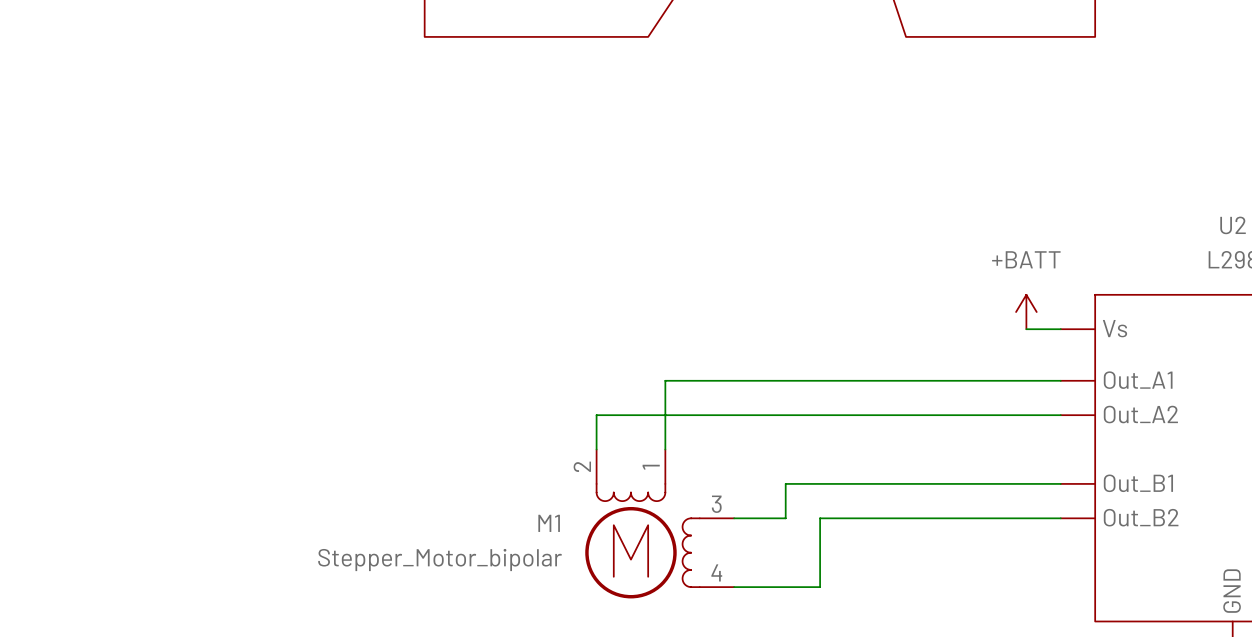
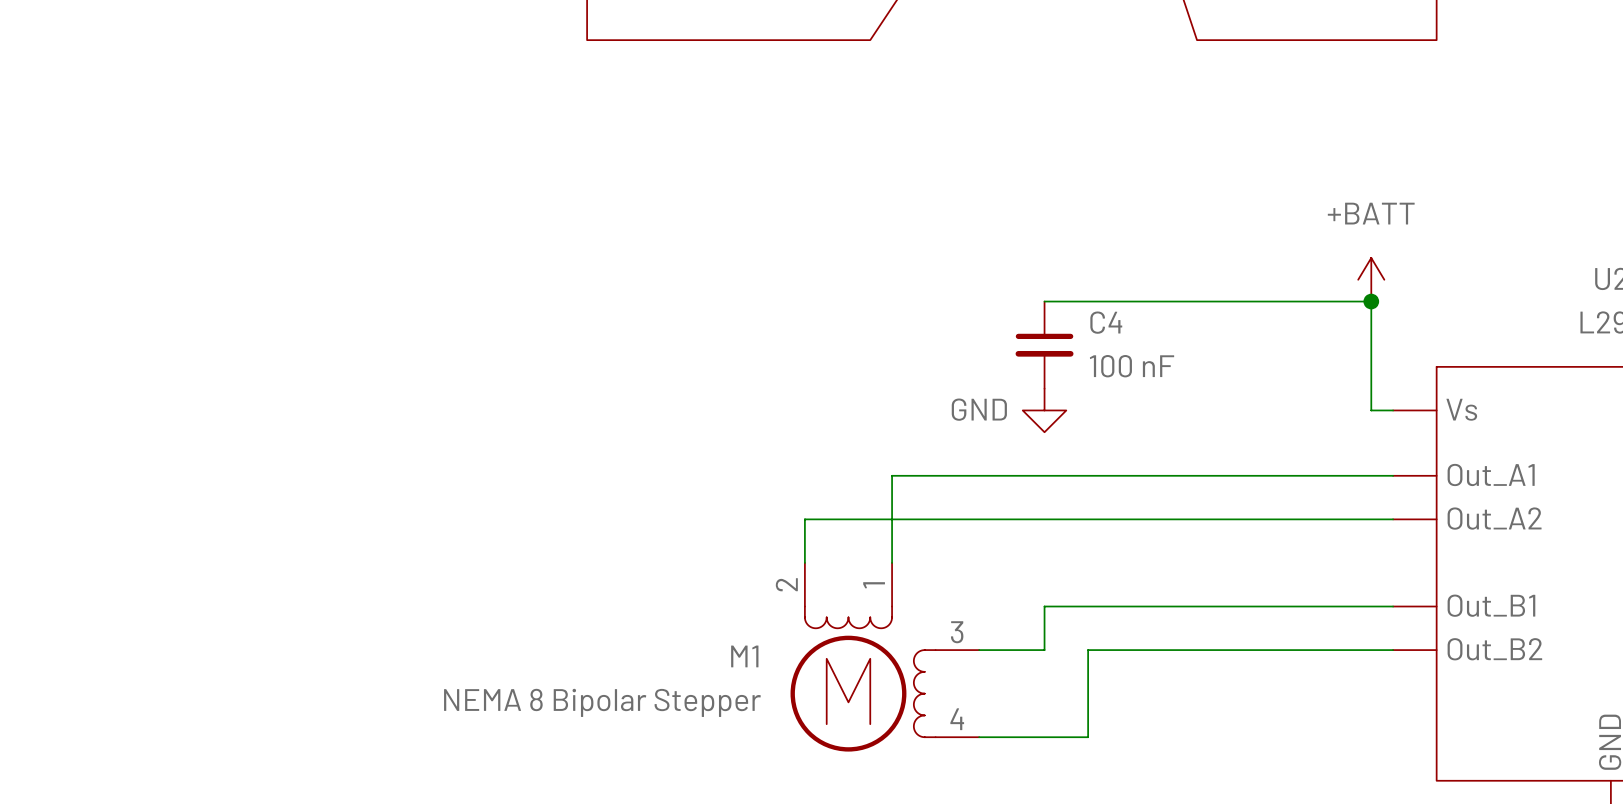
junction: none -> (1371, 301)
C4: none -> 100 nF (1044, 345)
power symbol position: +BATT (1026, 312) -> +BATT (1371, 279)
power symbol: none -> GND (1044, 410)
wire: (1026, 329) (1043, 329) -> (1044, 301) (1371, 301) (1371, 410)
M1 value: Stepper_Motor_bipolar (440, 560) -> NEMA 8 Bipolar Stepper (602, 702)

